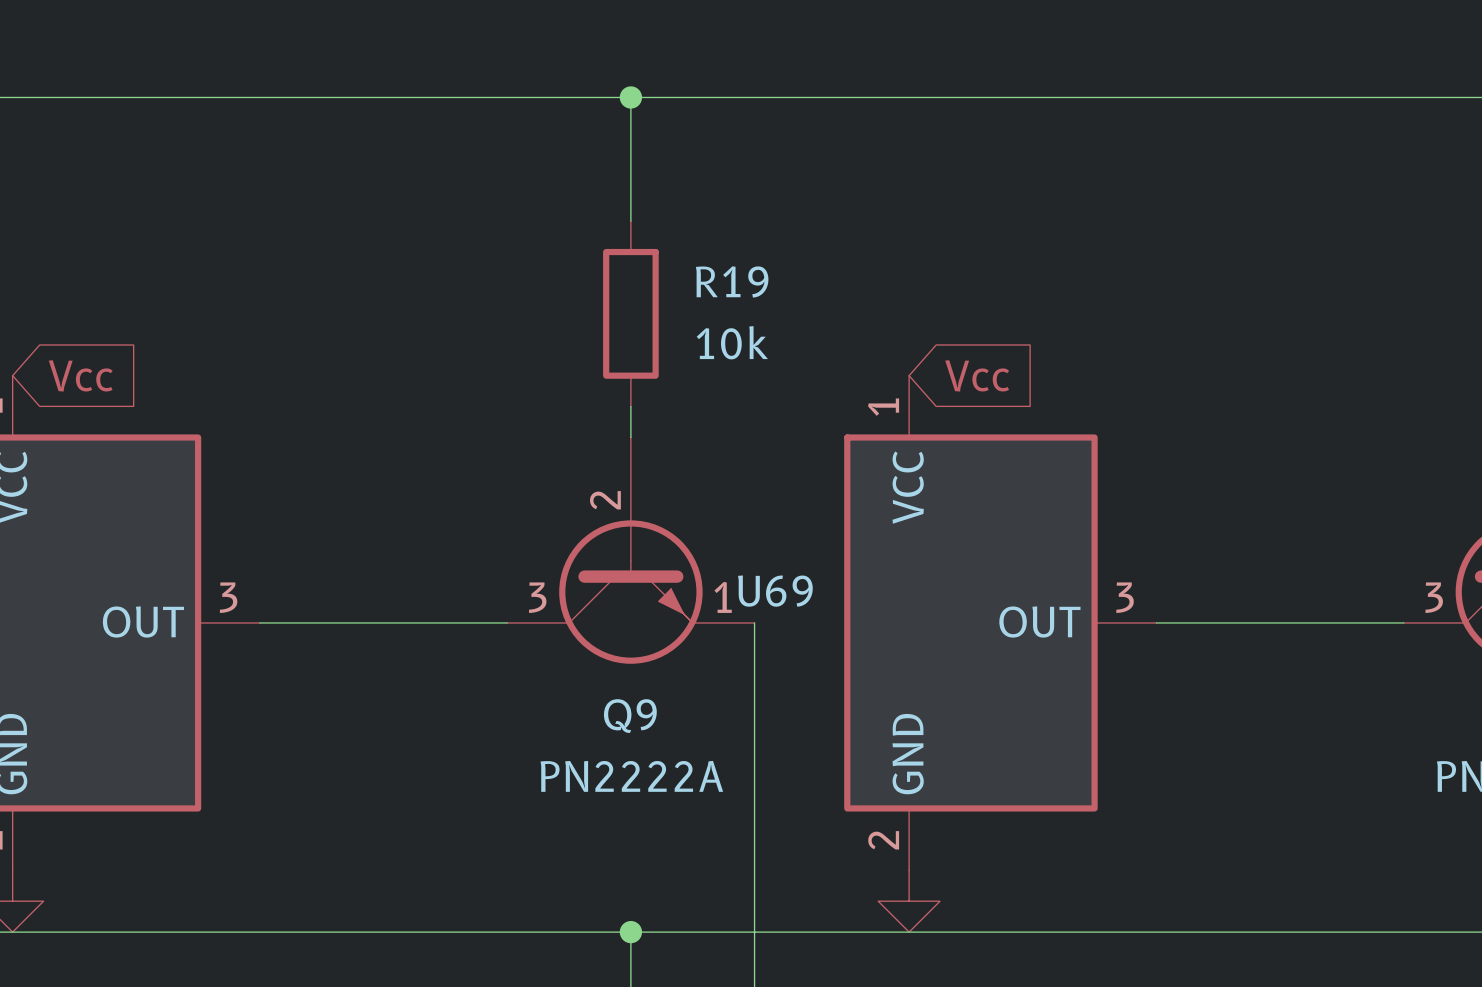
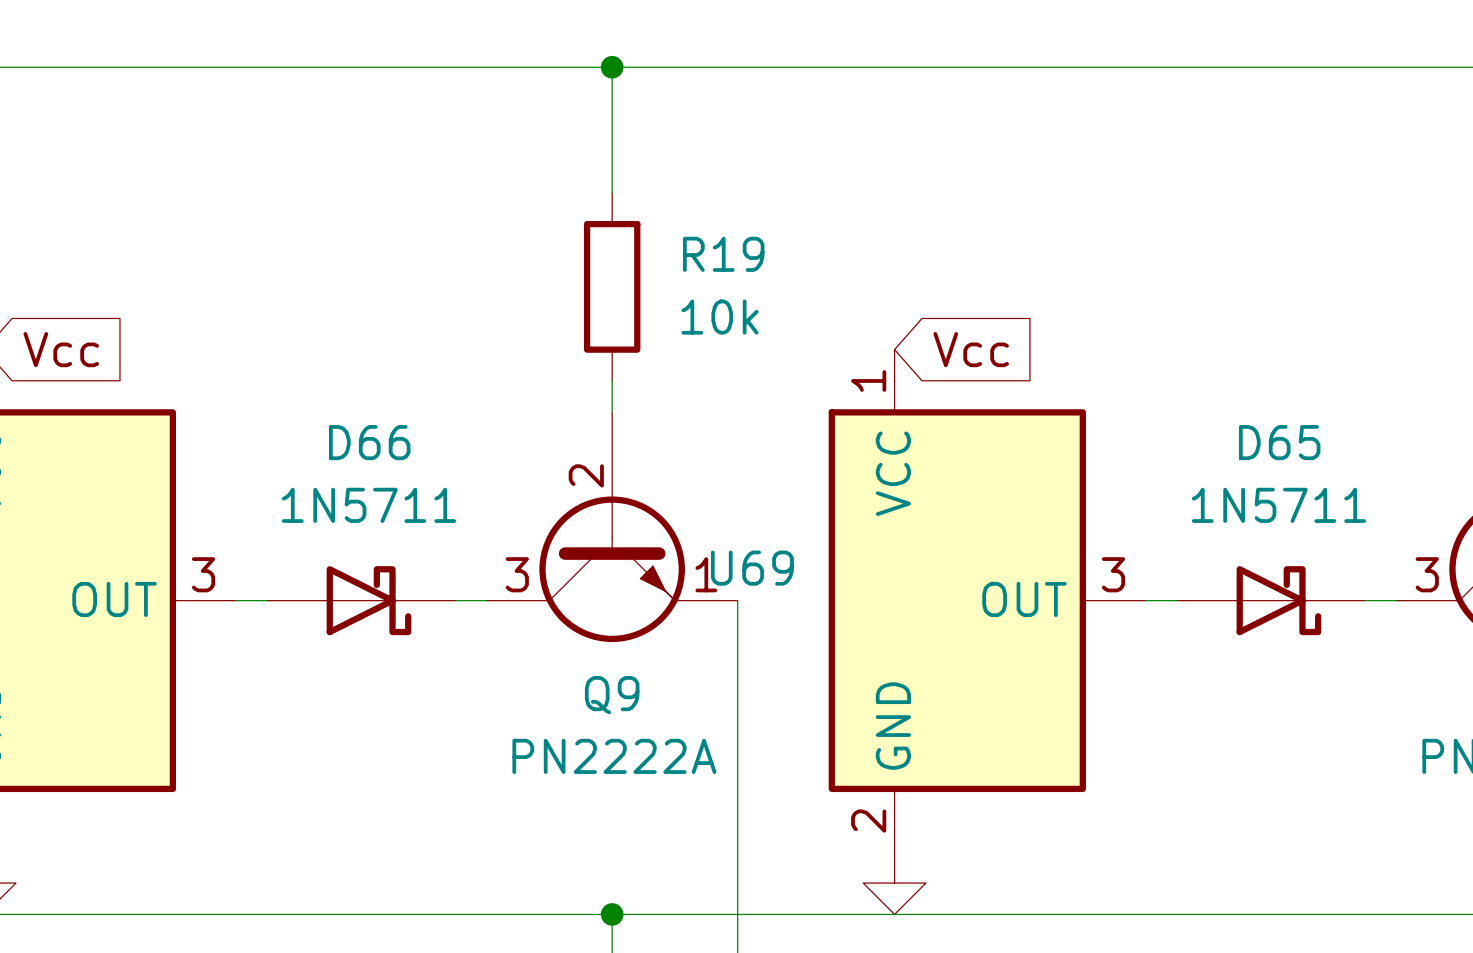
D66: none -> 1N5711 (361, 600)
D65: none -> 1N5711 (1271, 600)

